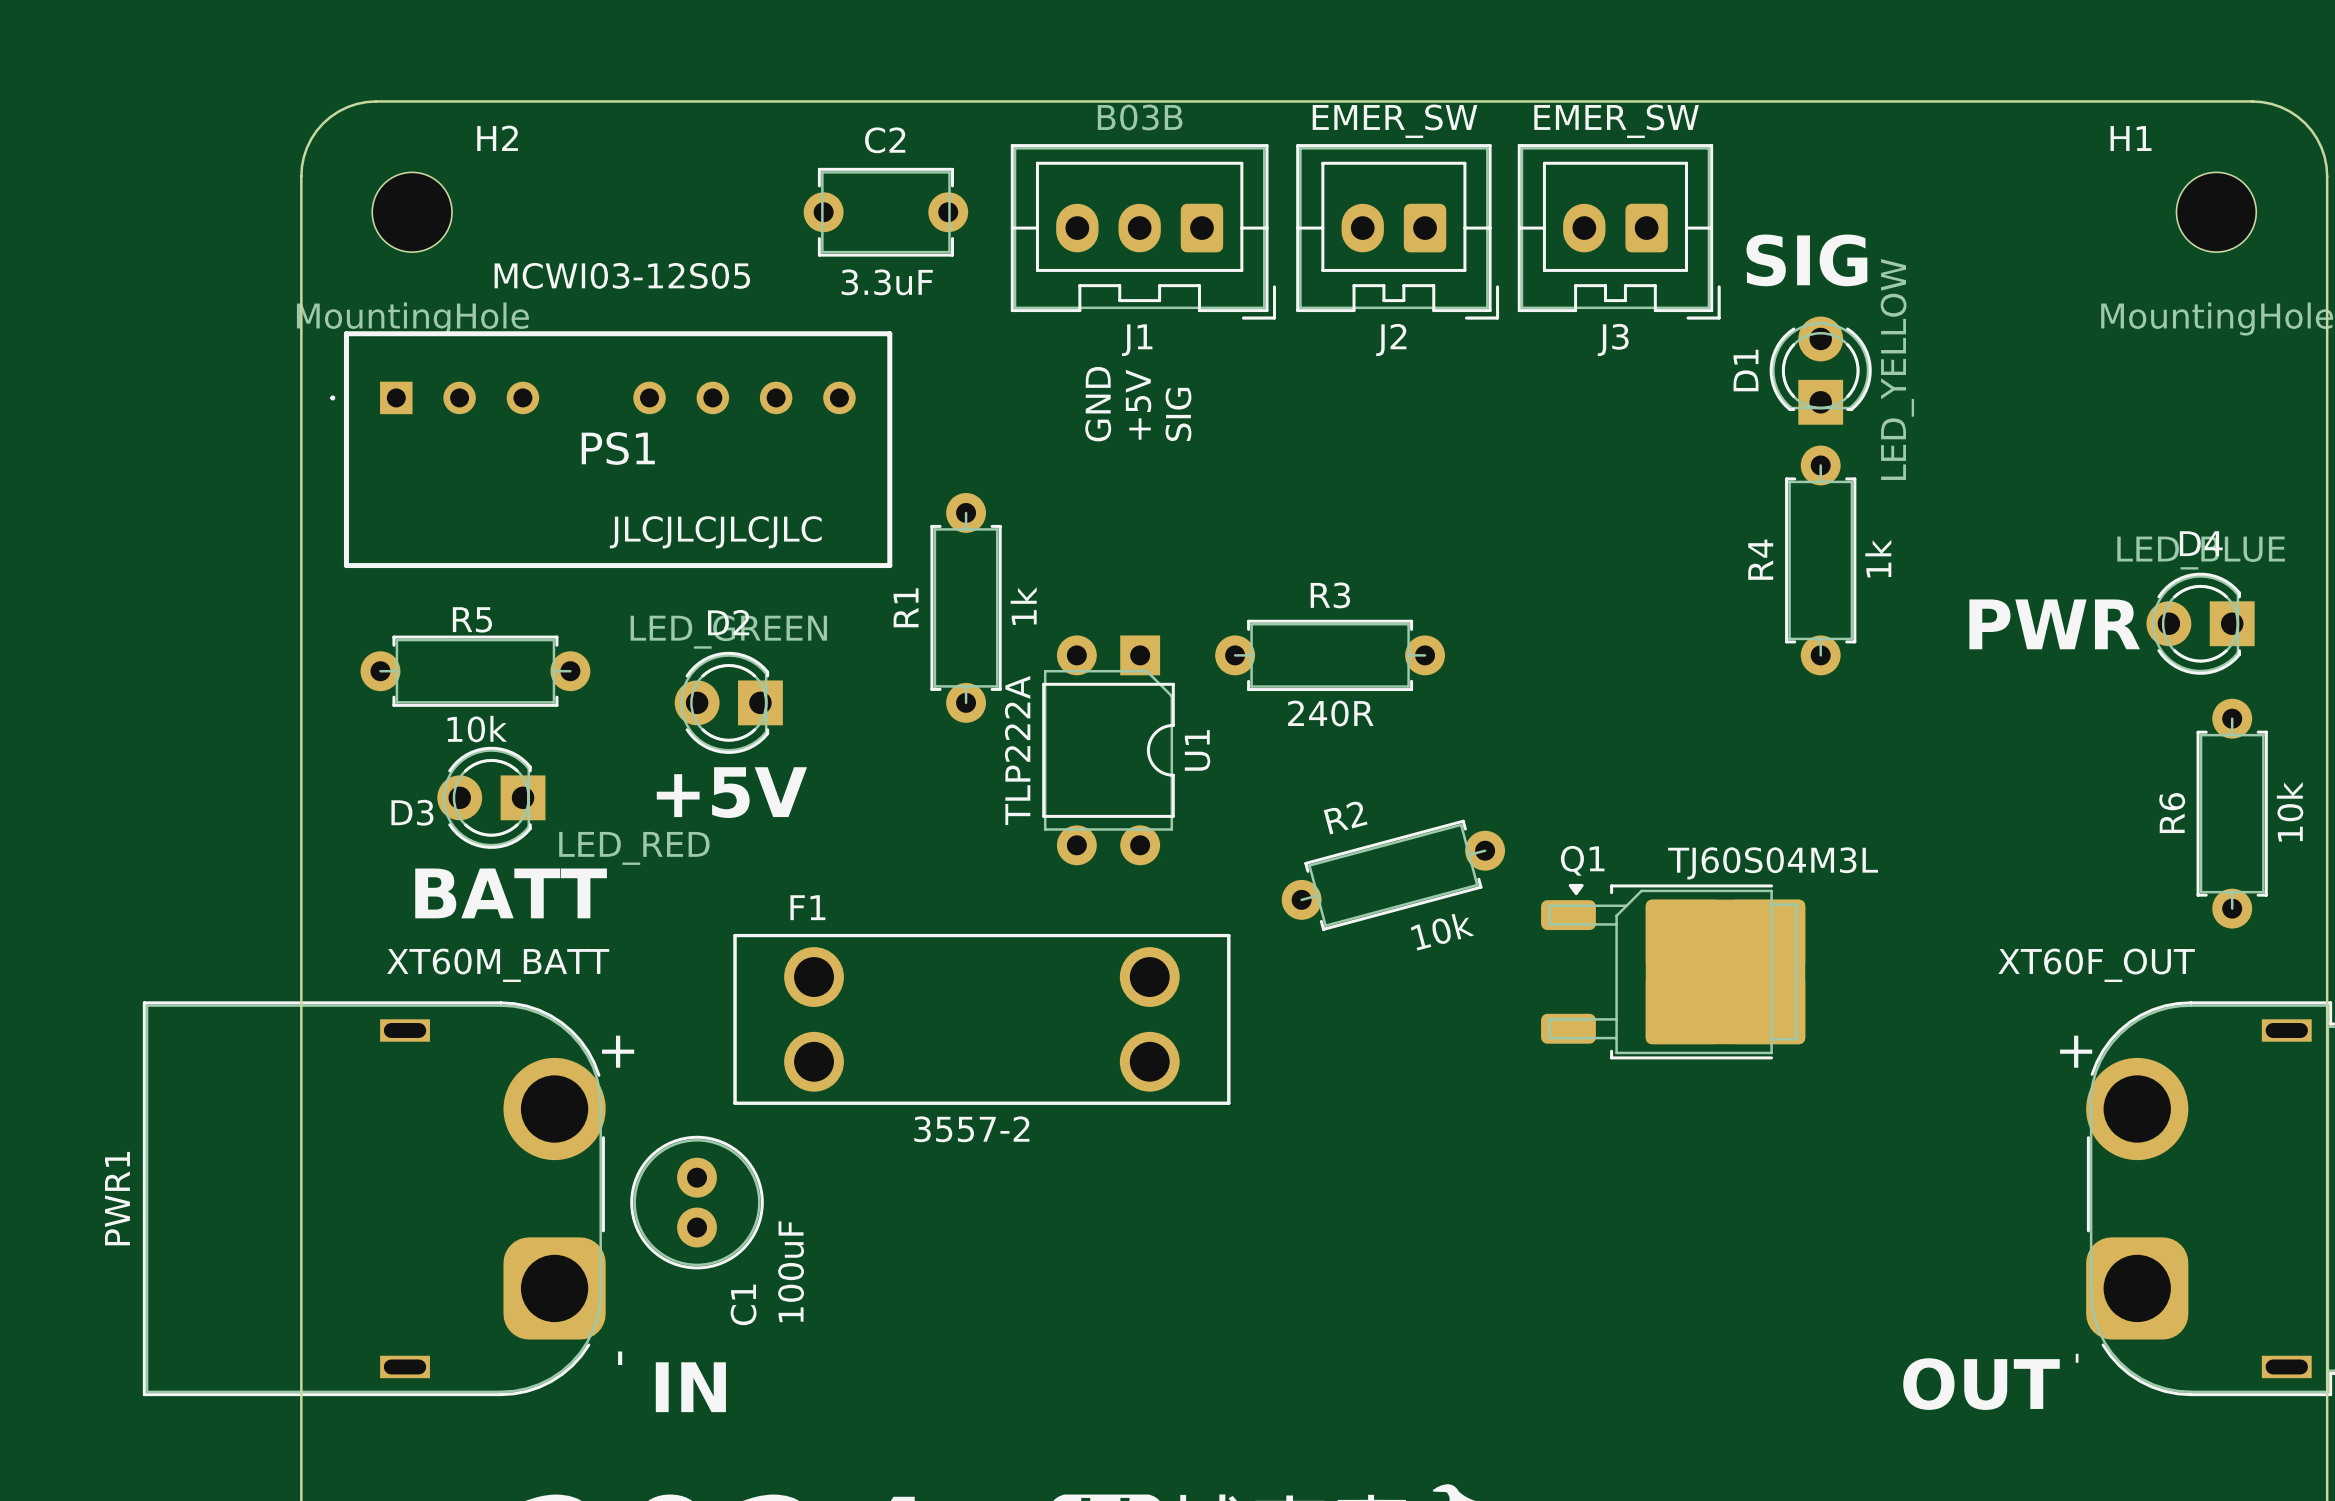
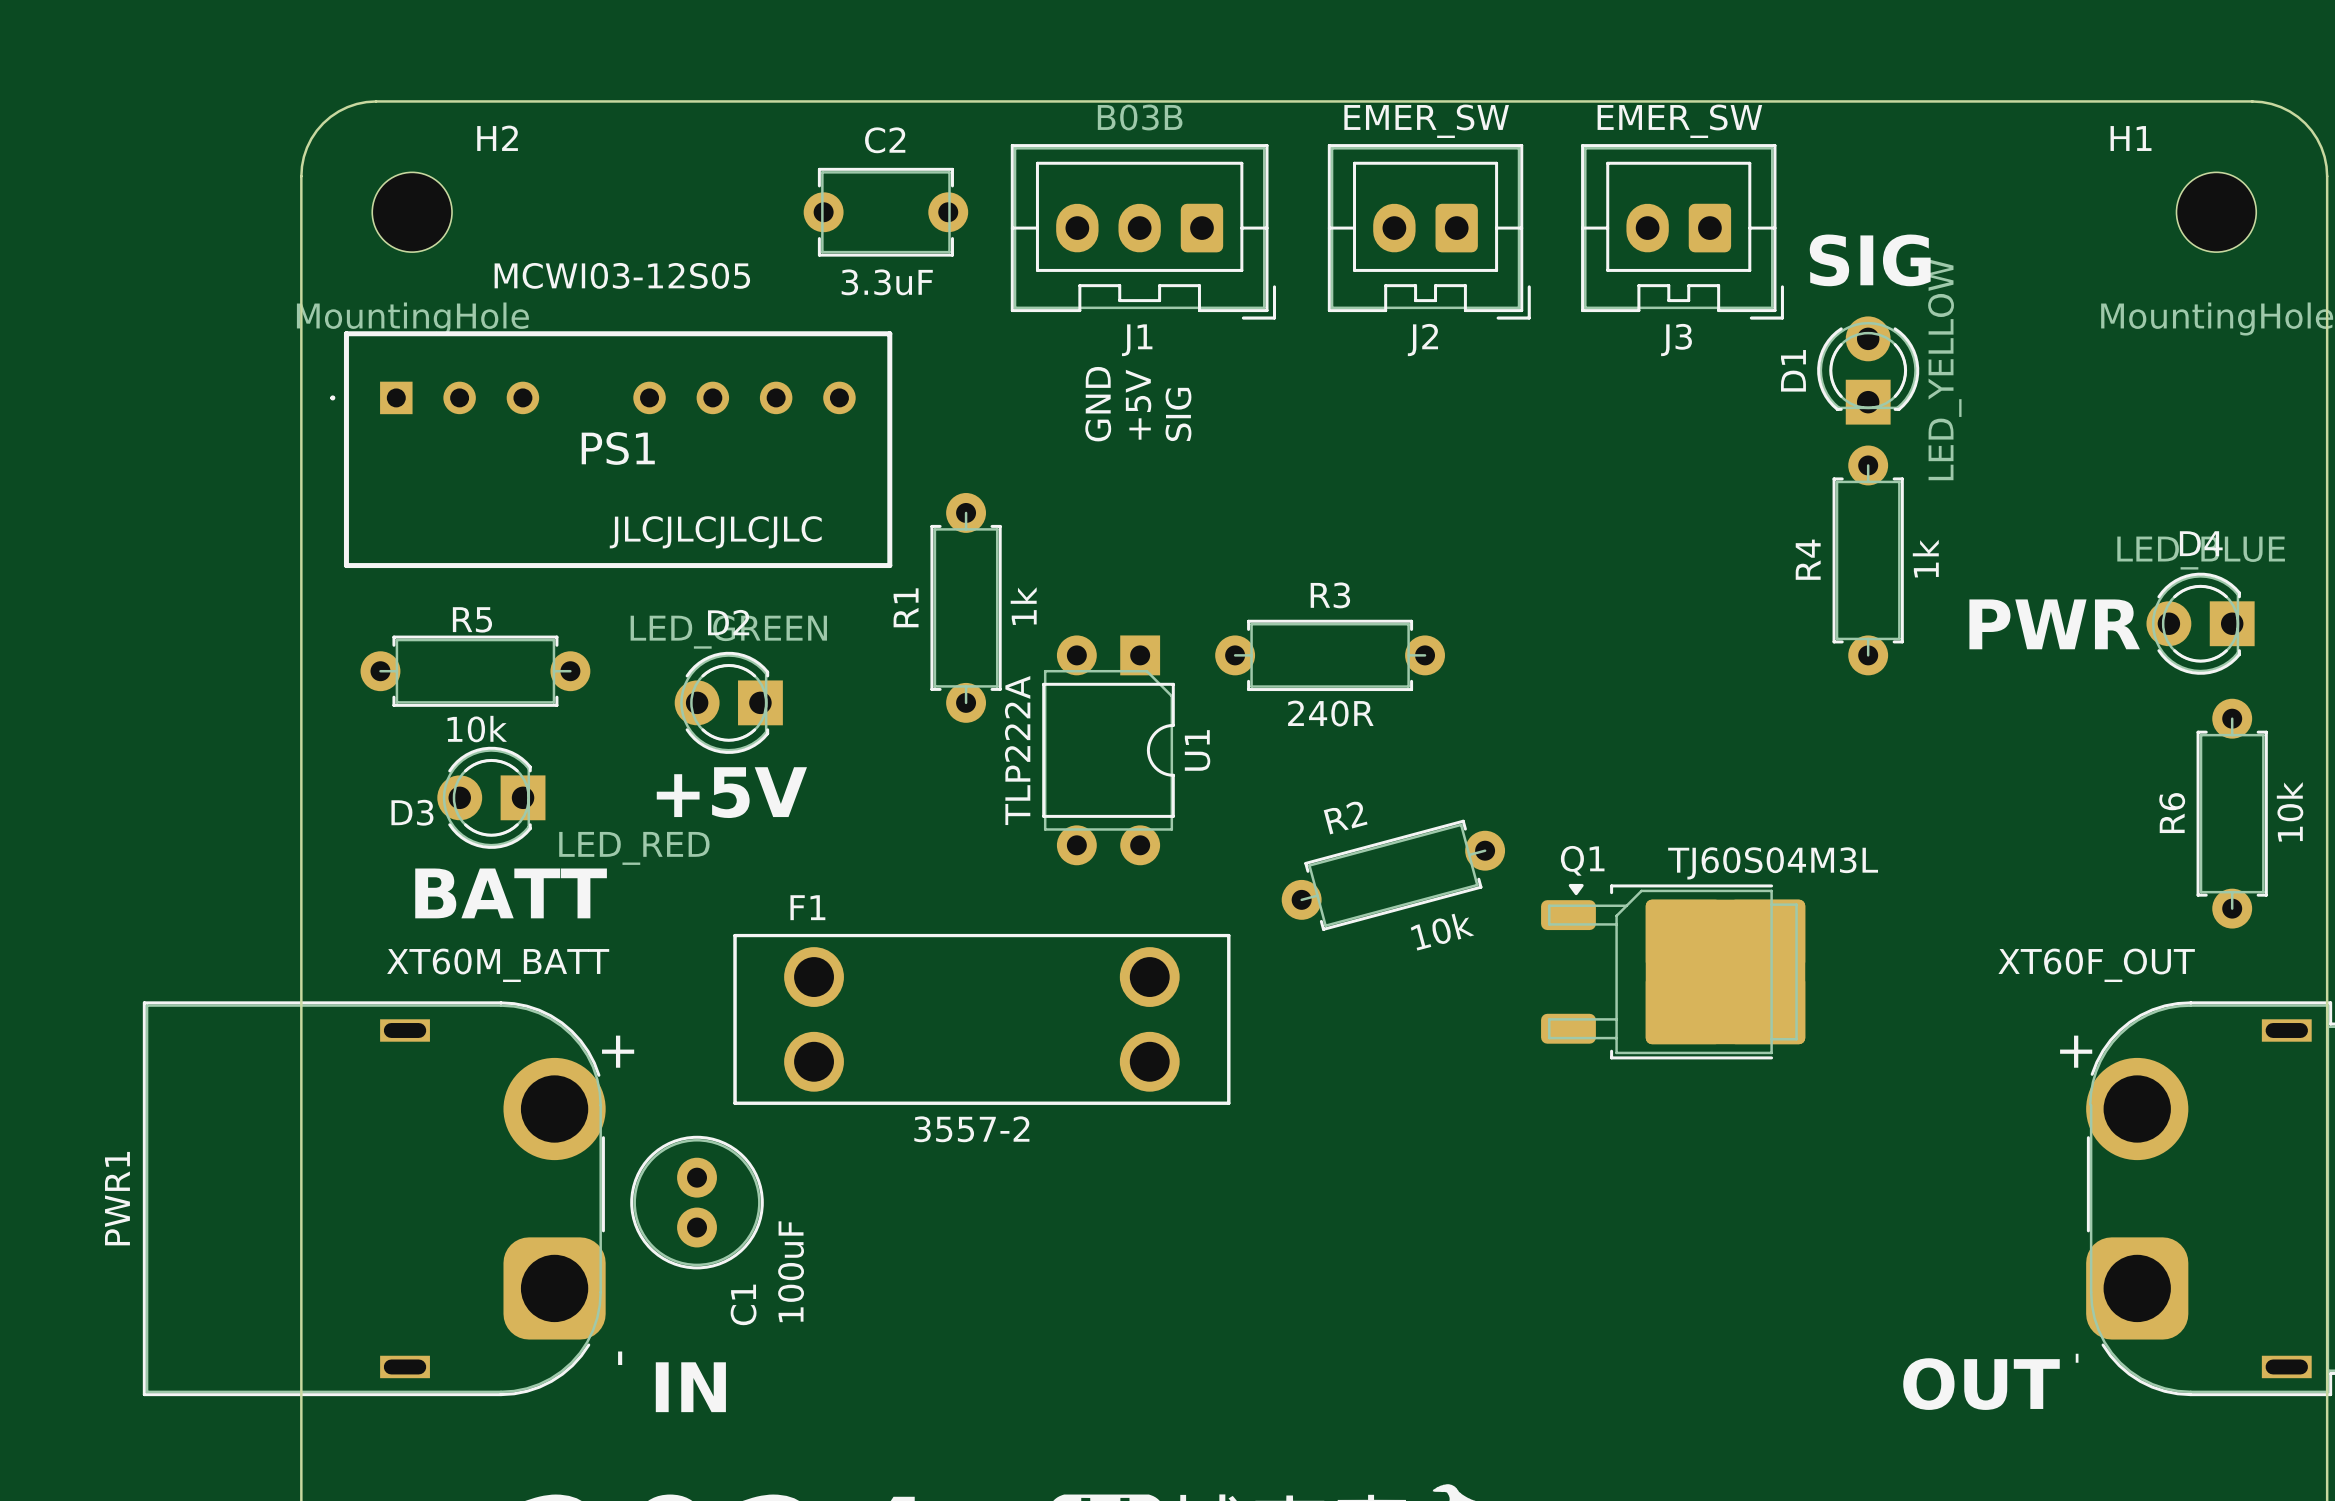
J2 position: (1397, 231) -> (1429, 231)
J3 position: (1619, 231) -> (1682, 231)
text position: SIG (1806, 260) -> SIG (1870, 260)
D1 position: (1820, 370) -> (1868, 370)
R4 position: (1820, 560) -> (1868, 560)

